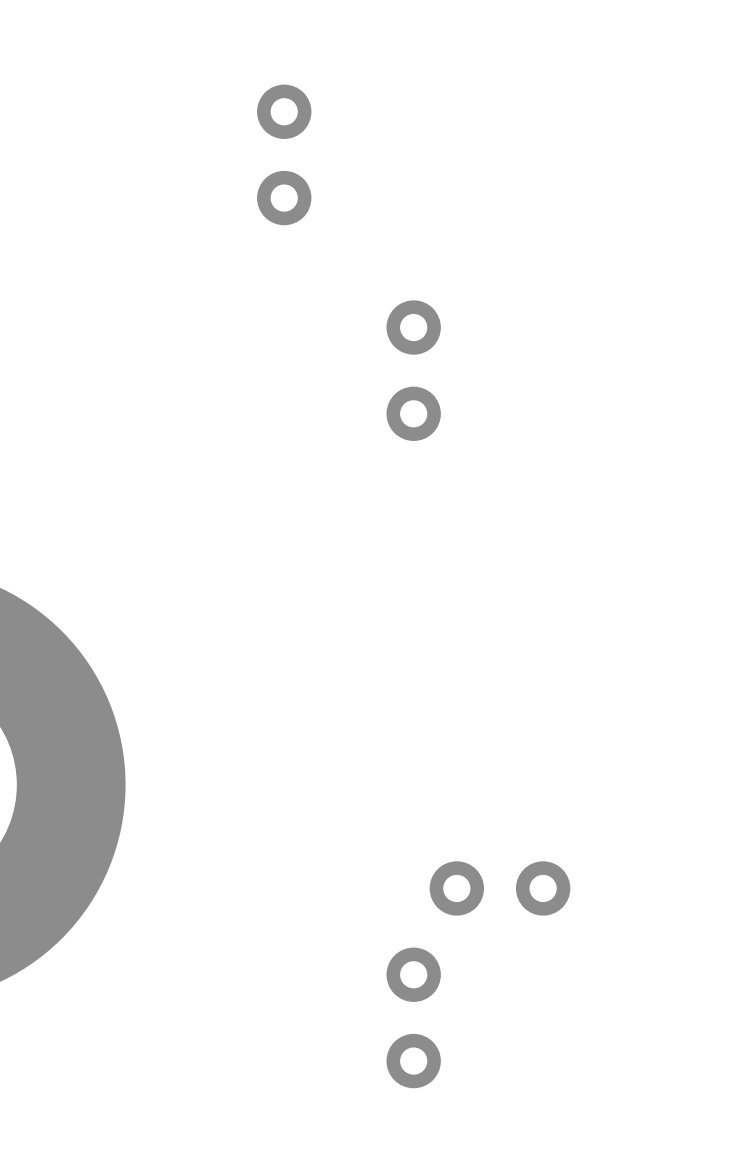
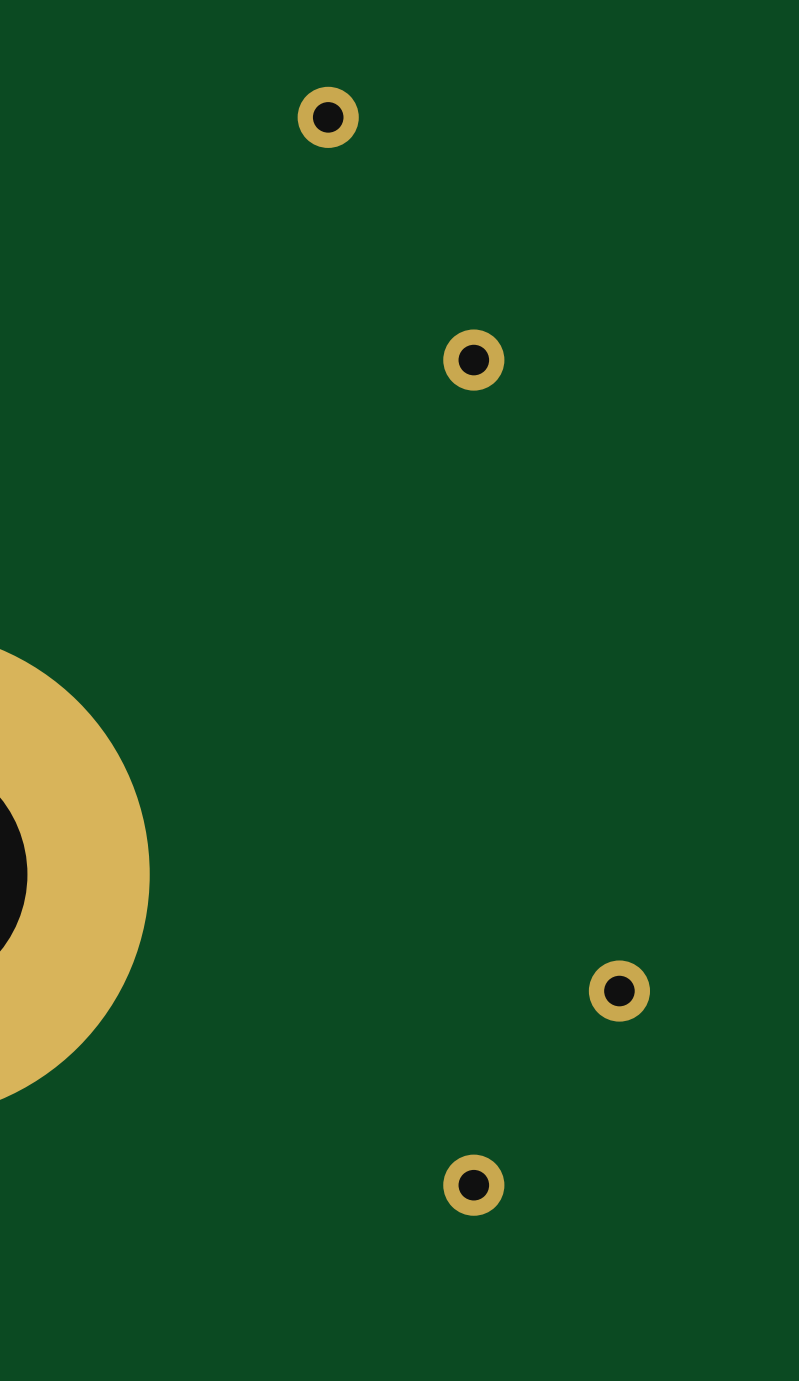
via: (284, 198) -> none
via: (413, 413) -> none
via: (456, 888) -> none
via: (413, 974) -> none

